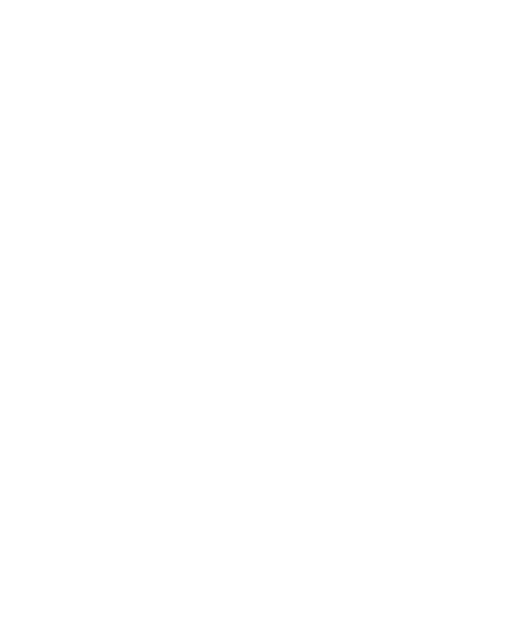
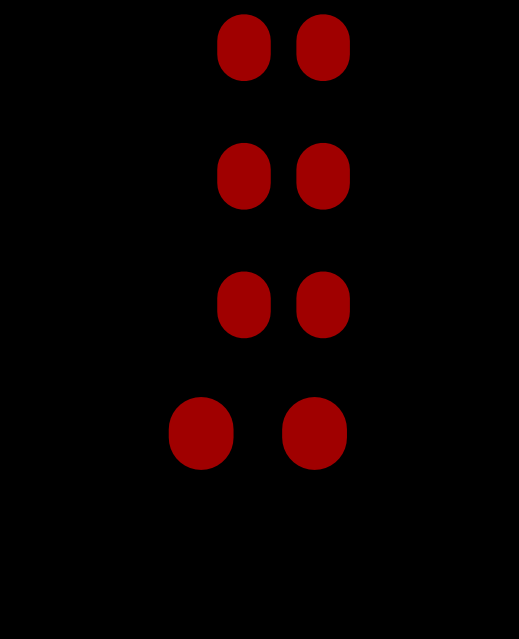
part: none -> (283, 47)
part: none -> (283, 176)
part: none -> (283, 304)
part: none -> (257, 433)

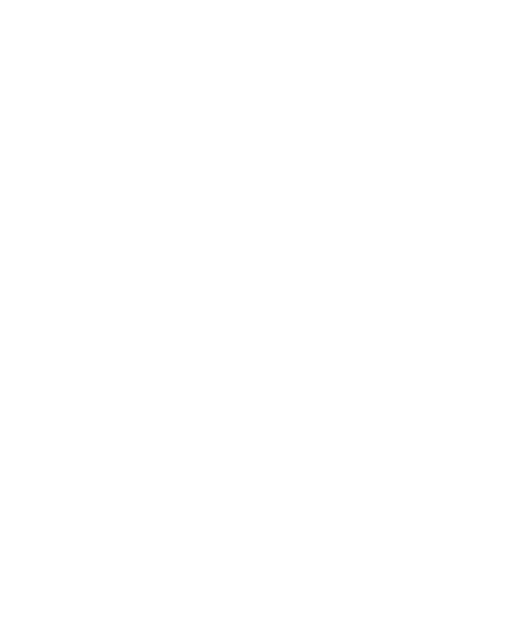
part: (283, 47) -> none
part: (283, 176) -> none
part: (283, 304) -> none
part: (257, 433) -> none

